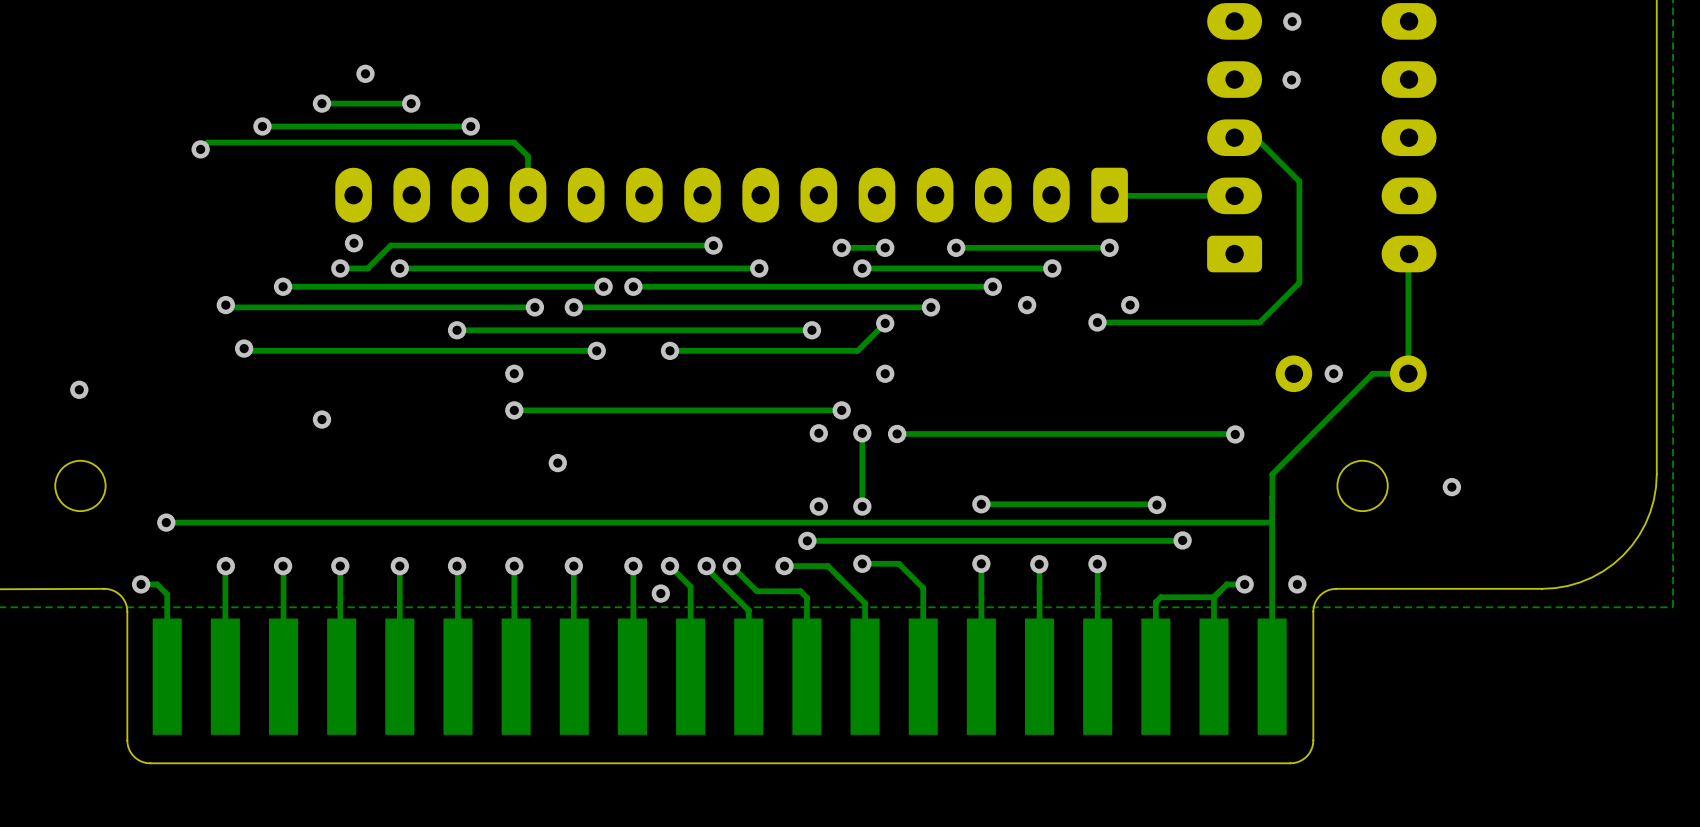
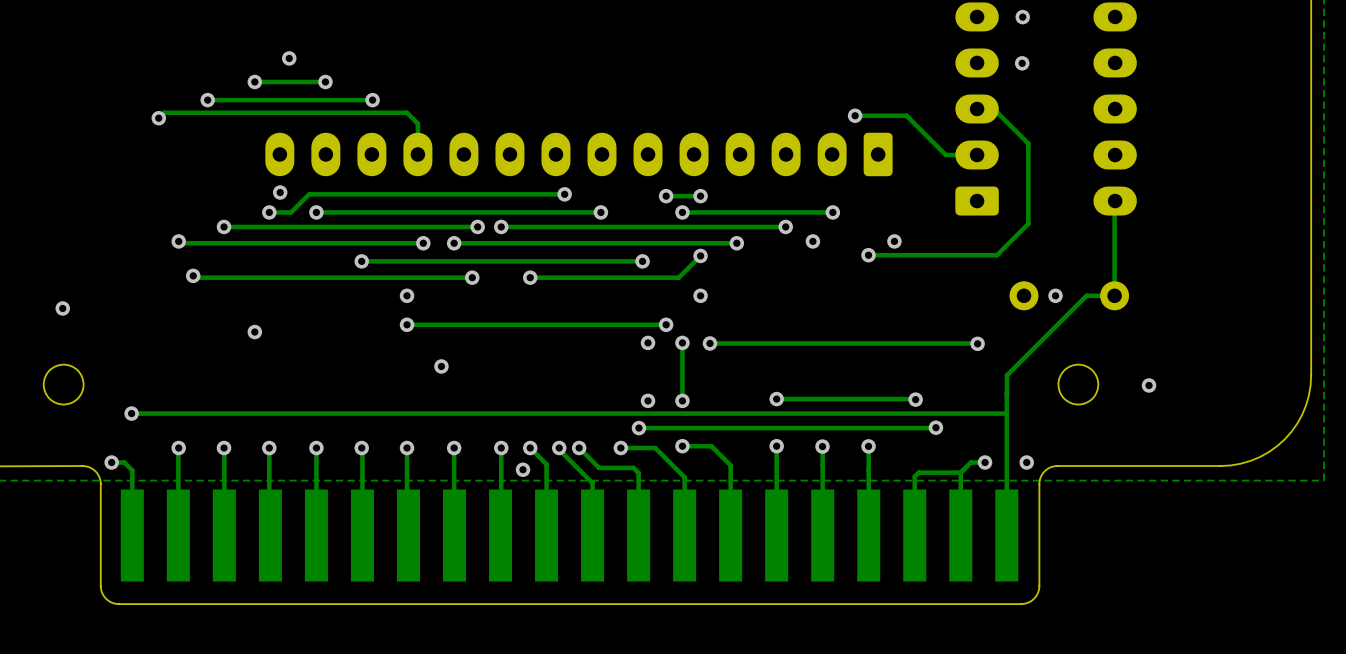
via: none -> (855, 115)
track: (1195, 195) (1110, 195) -> (945, 155) (906, 115) (855, 115)
via: (956, 247) -> none
track: (1109, 247) (956, 247) -> none
via: (1109, 247) -> none

